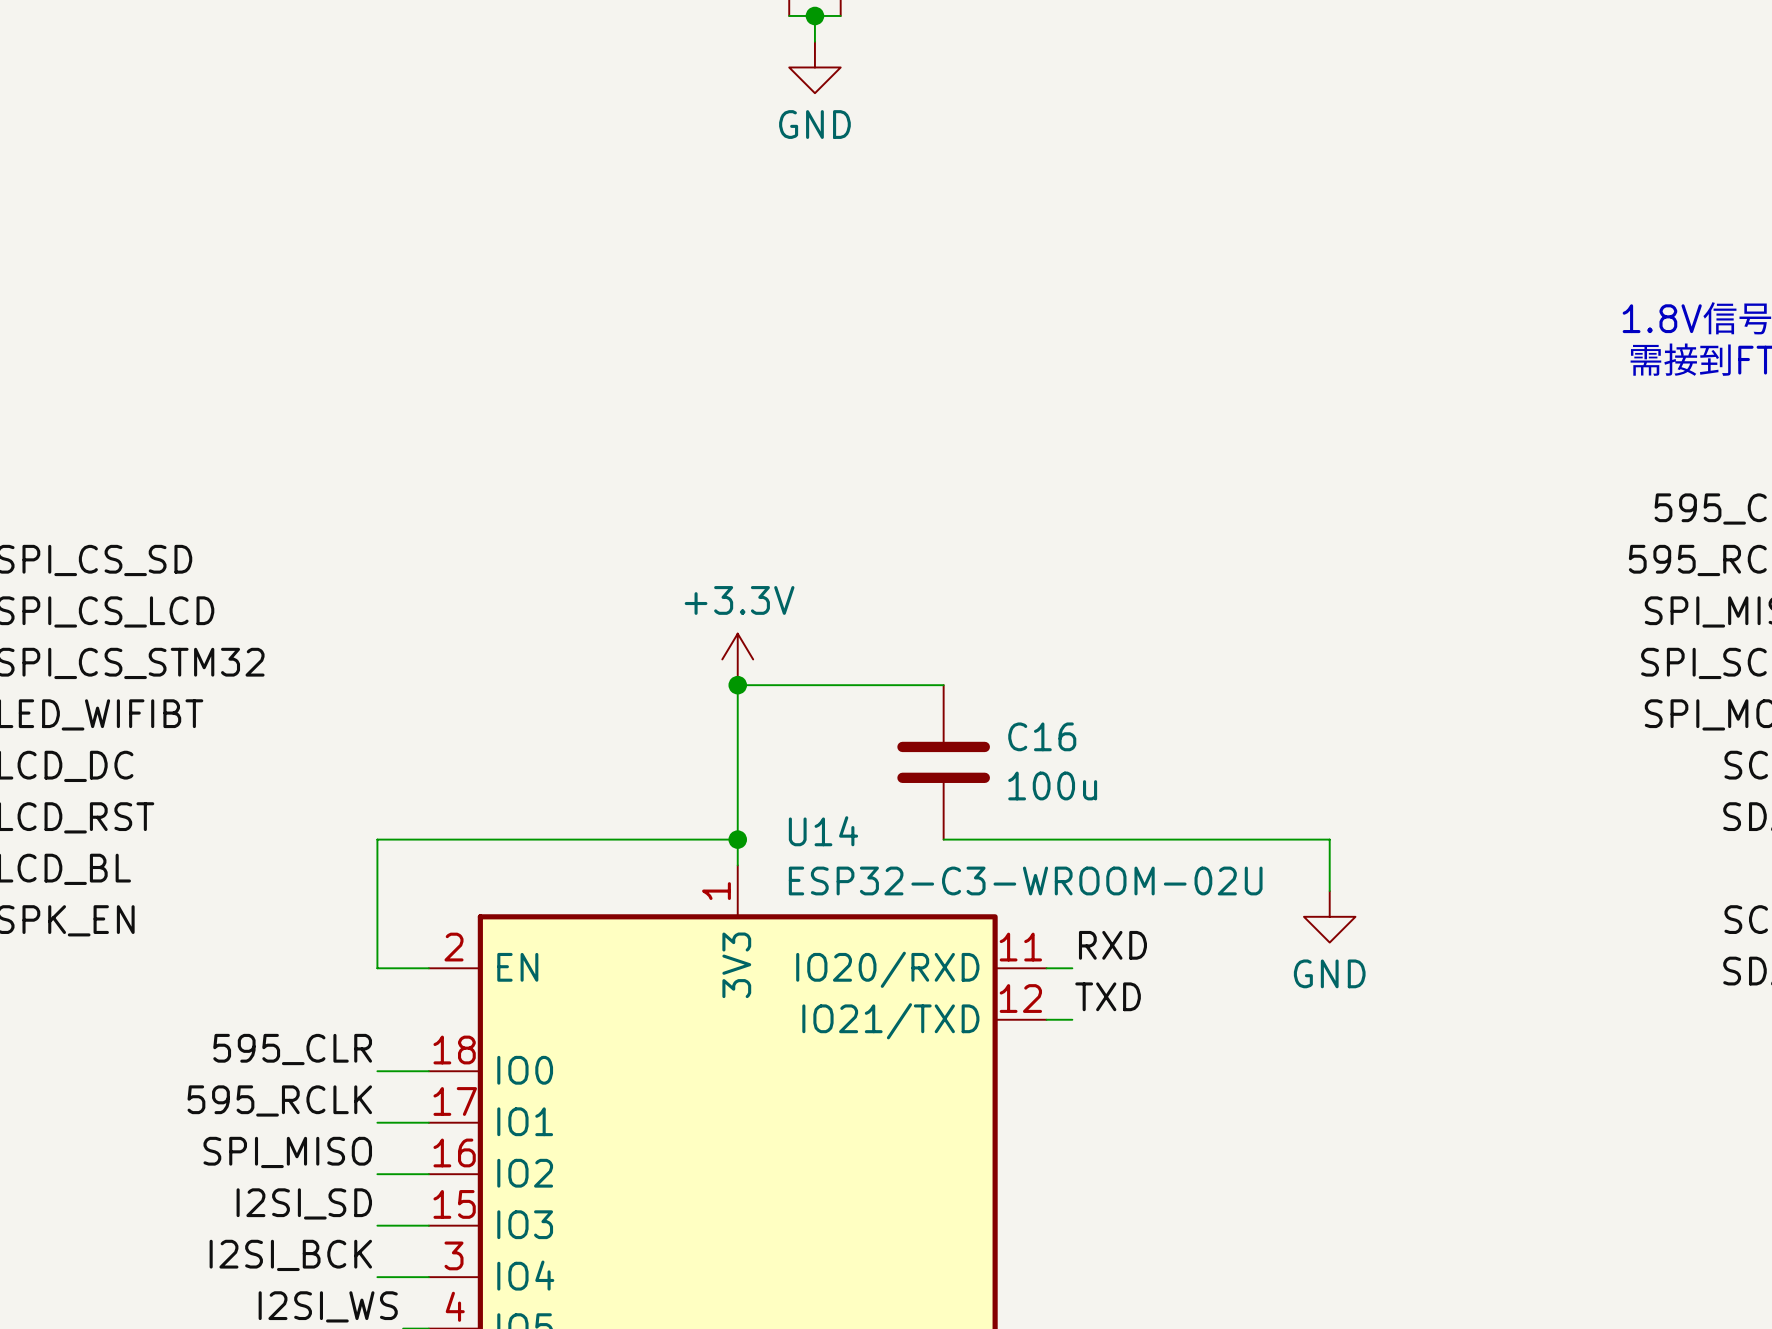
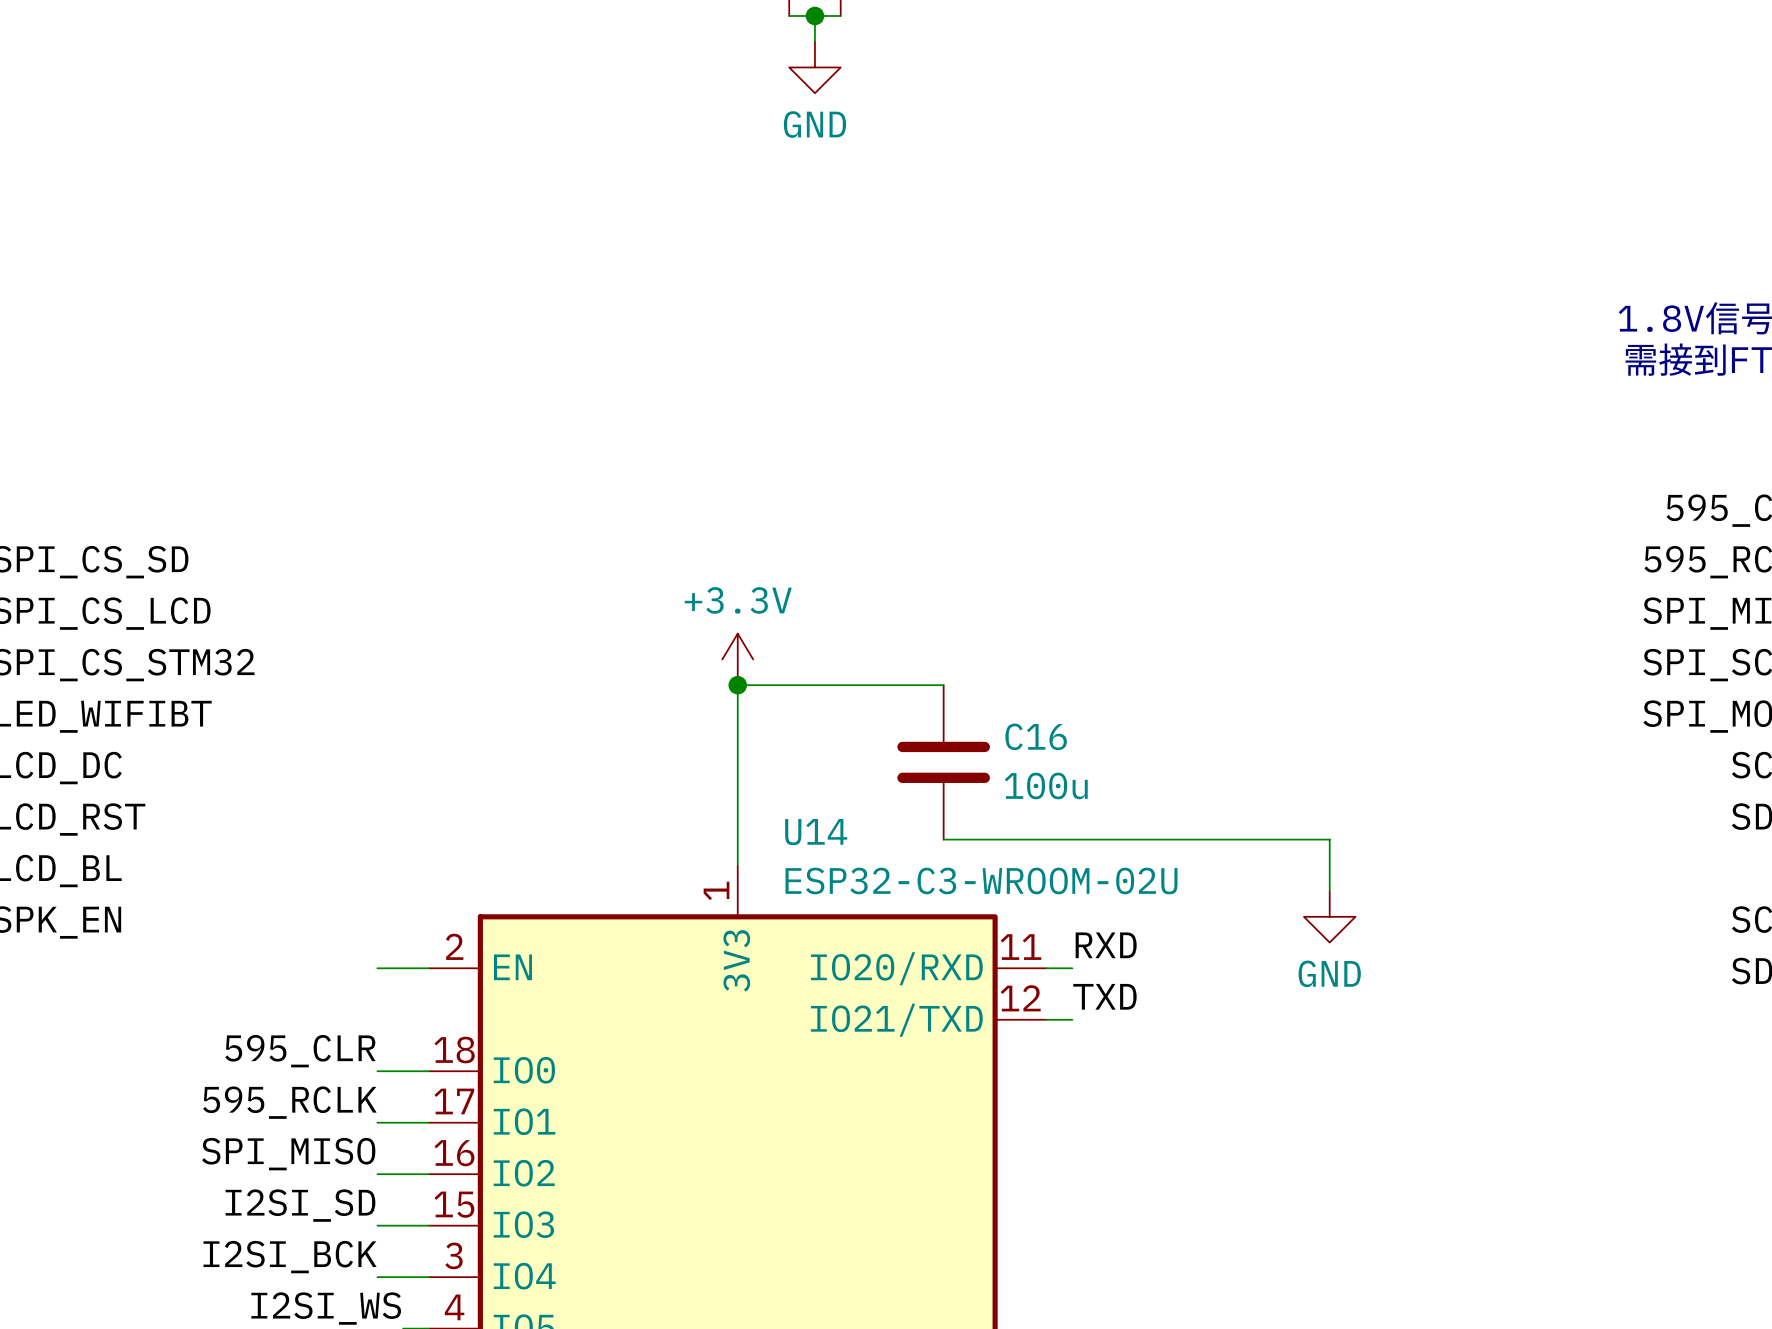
wire: (737, 839) (377, 839) (377, 968) -> none
junction: (737, 839) -> none

